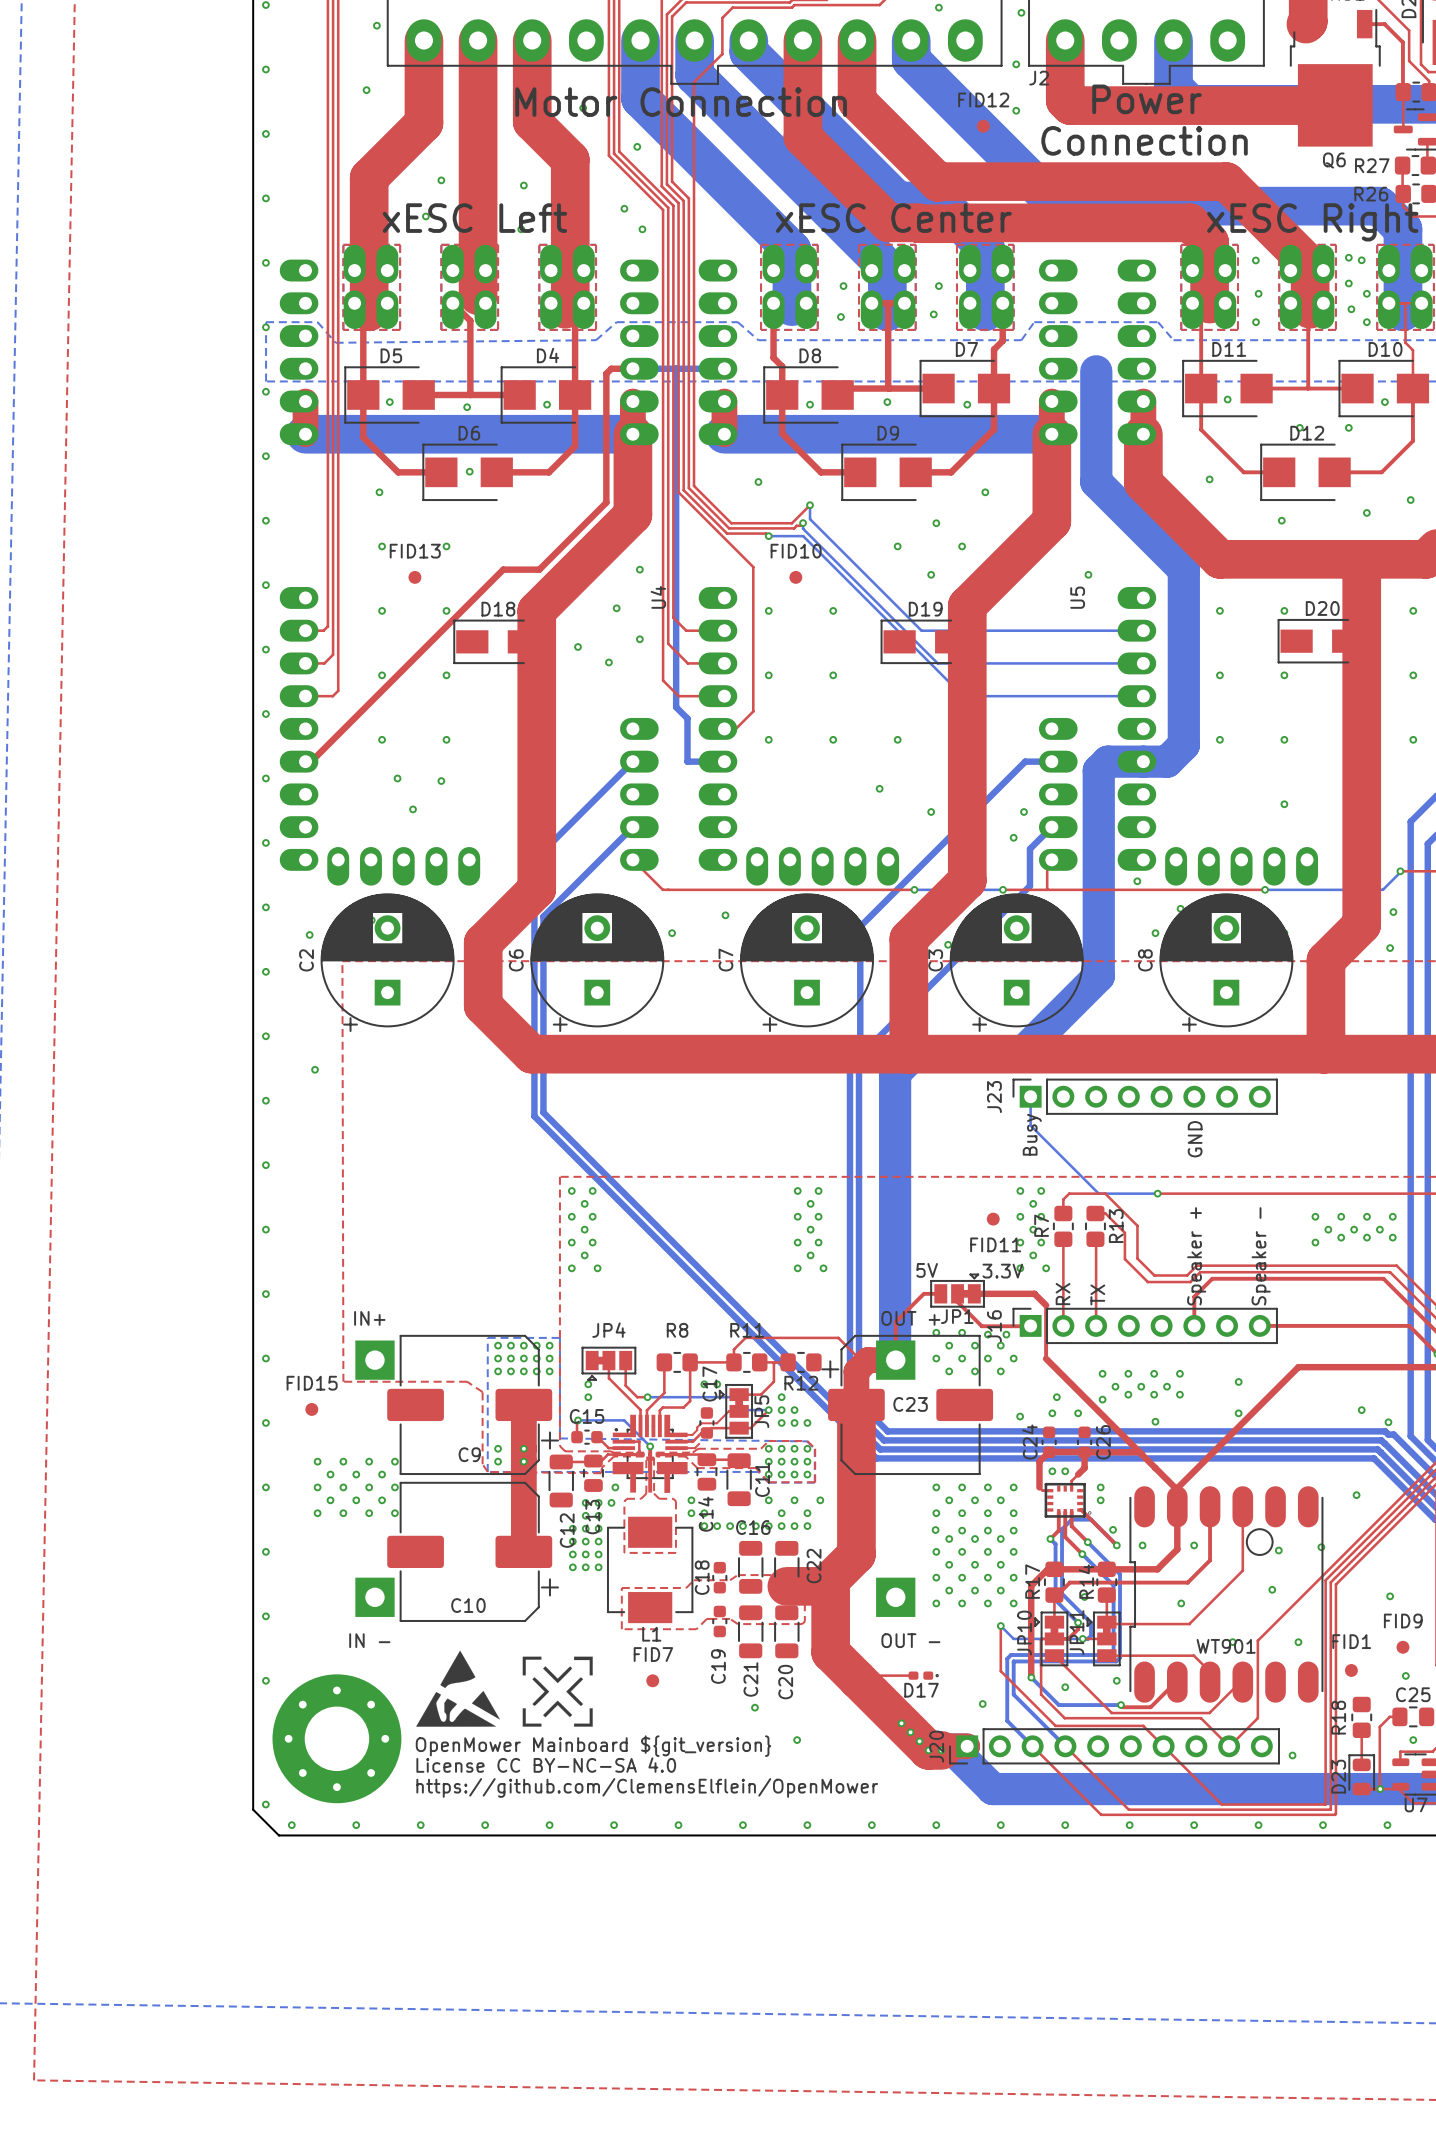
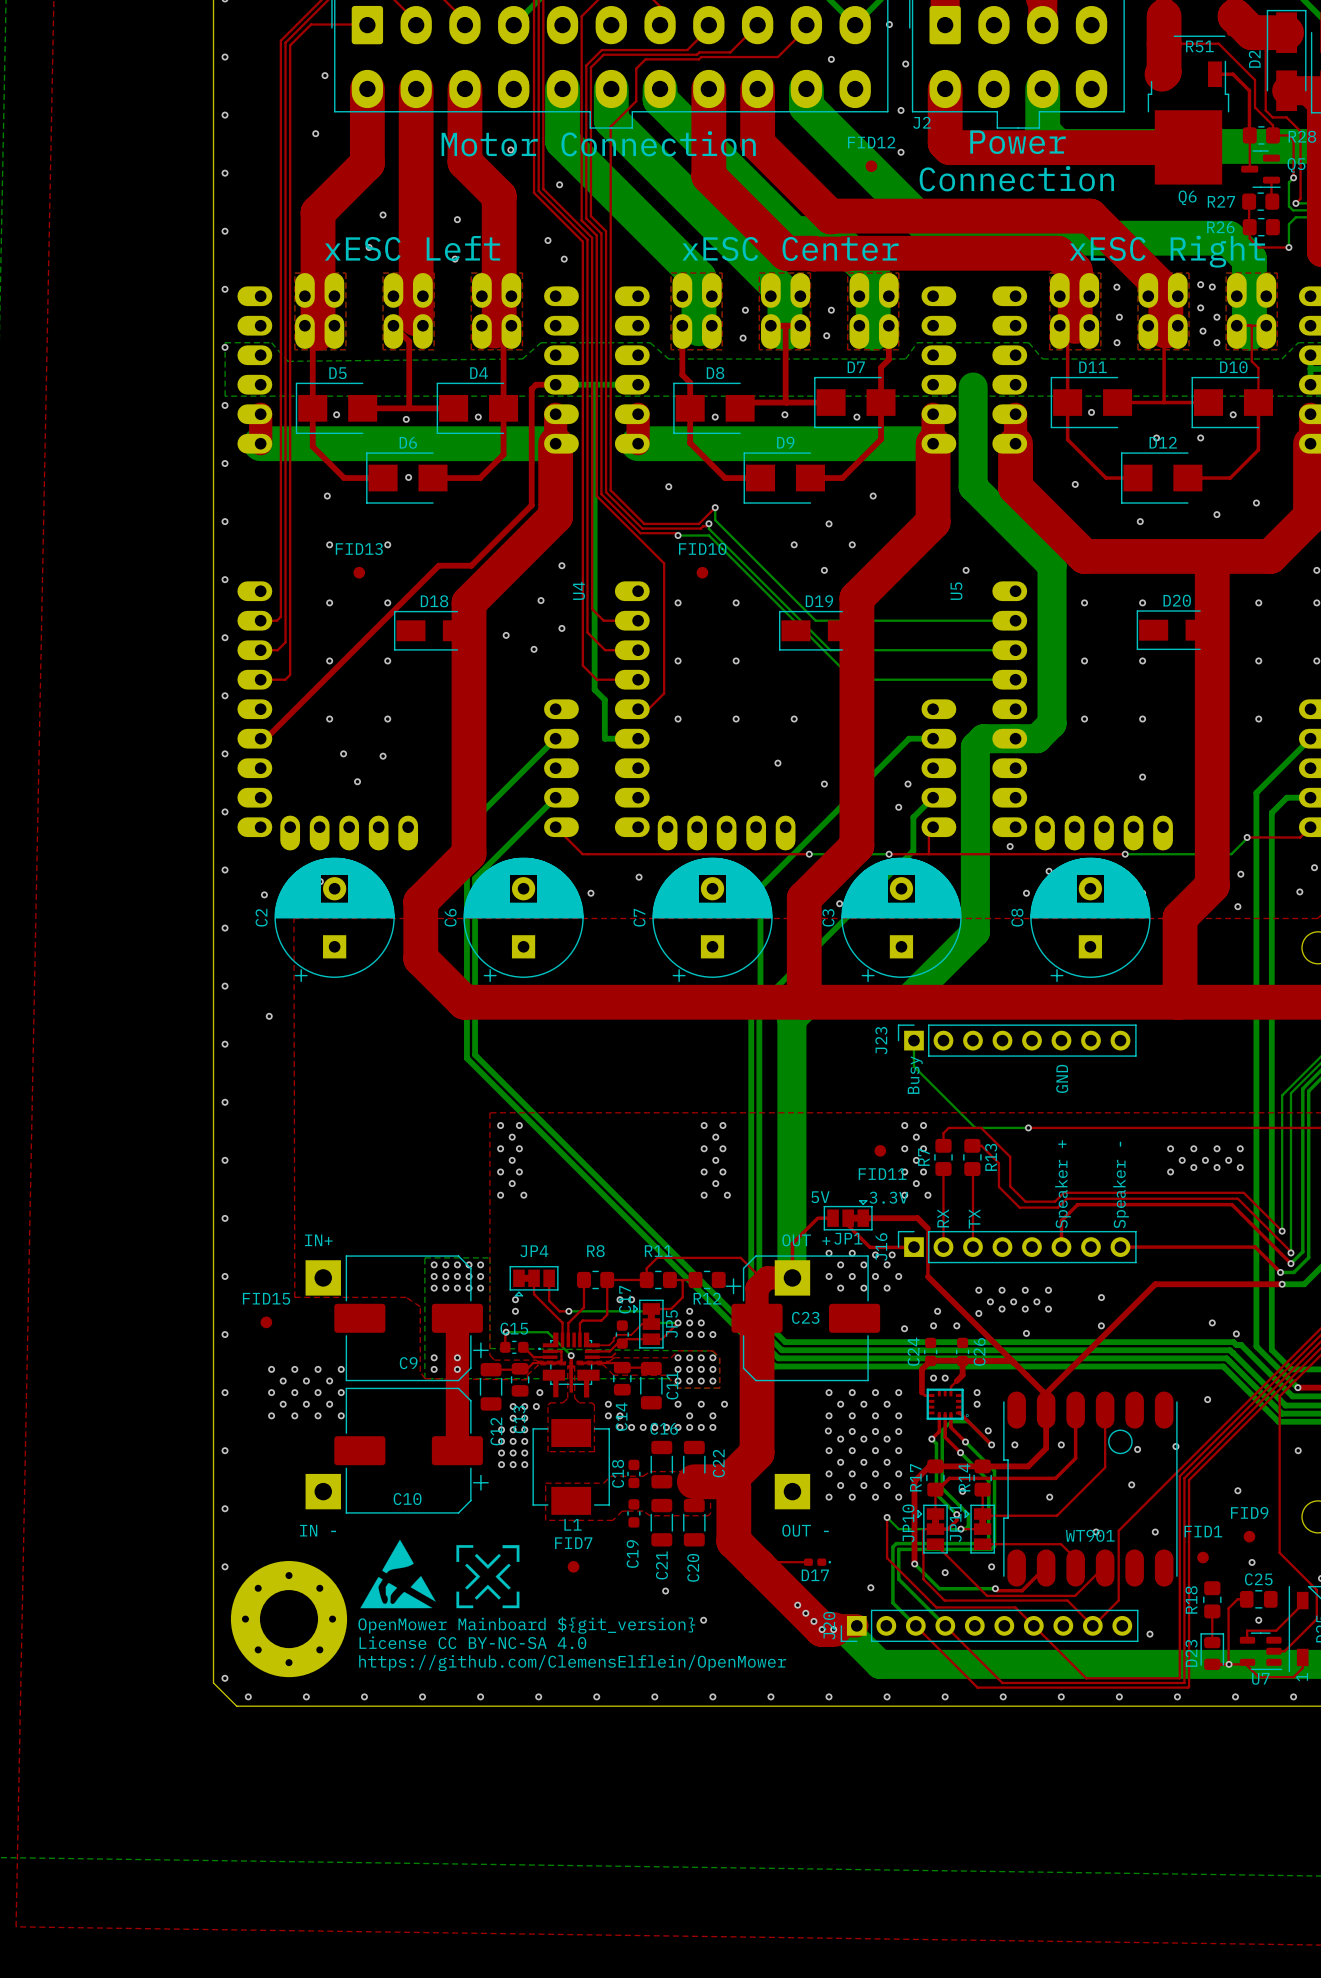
part footprint: [612, 1414, 688, 1493] -> [538, 1332, 600, 1398]

